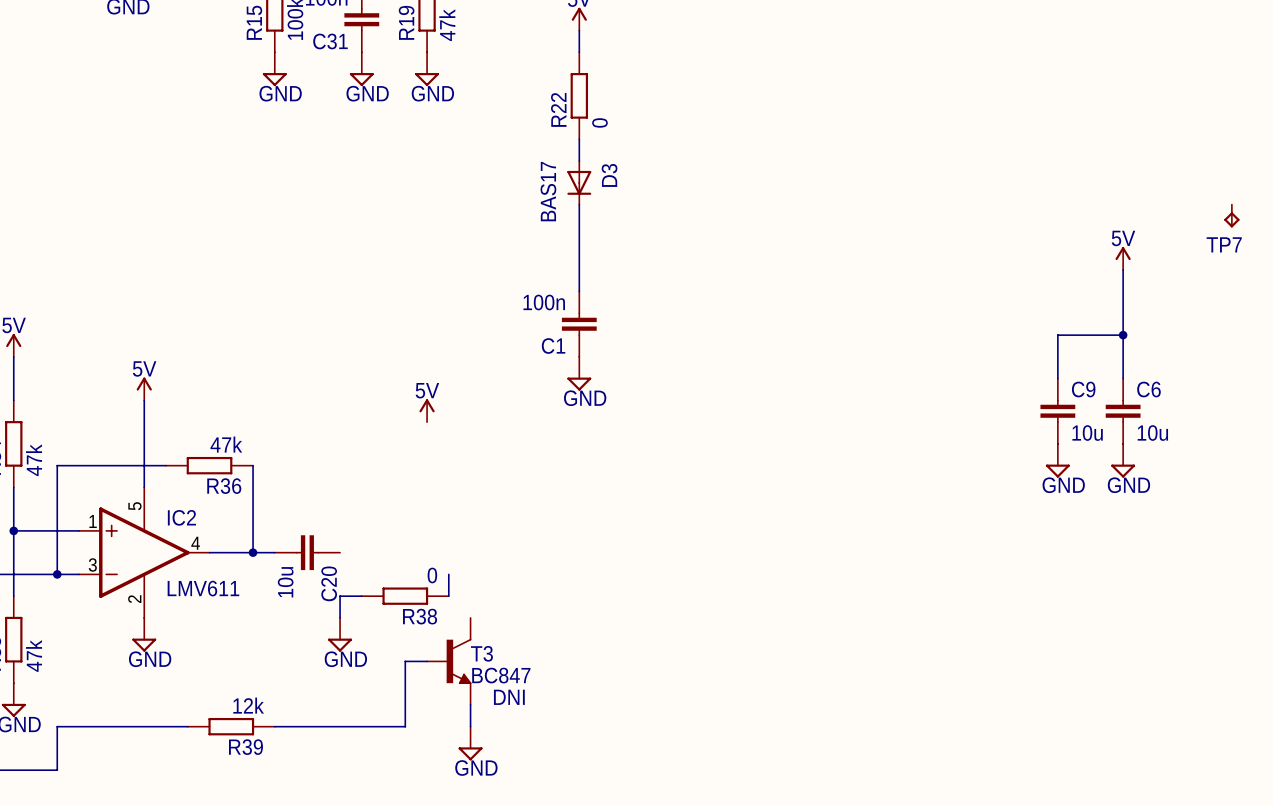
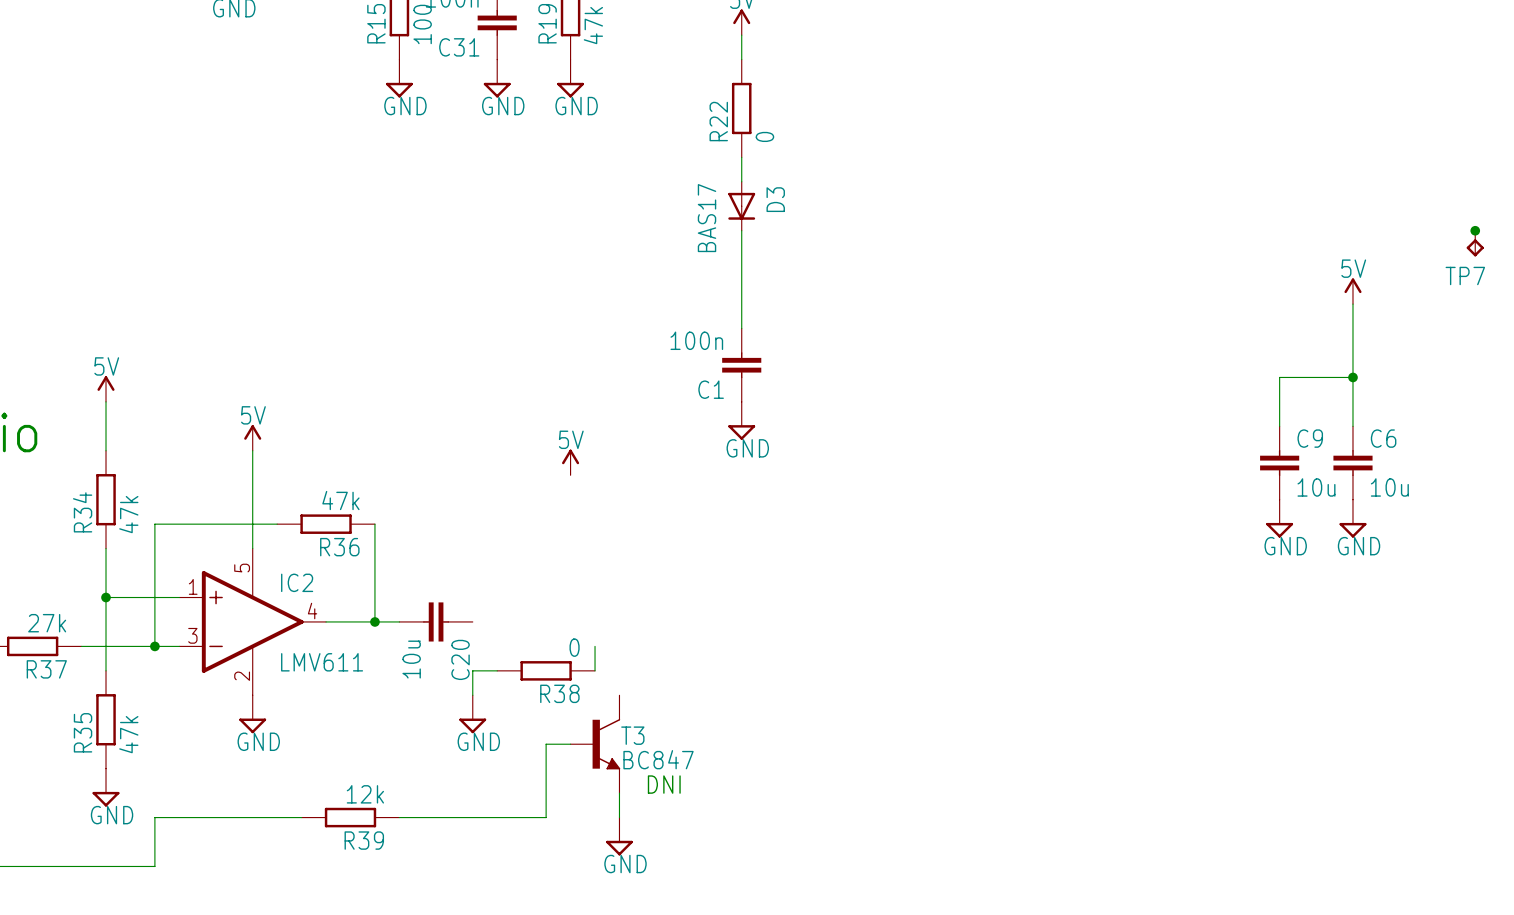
junction: none -> (1475, 230)

